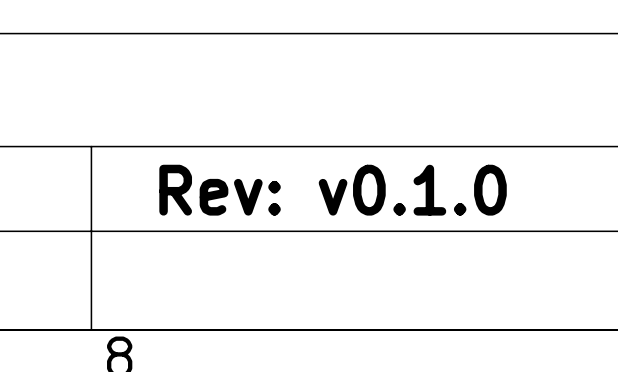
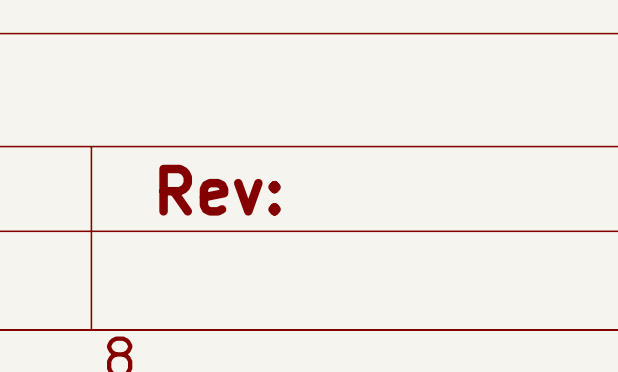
title block: Rev: v0.1.0 (333, 190) -> Rev: (220, 190)

